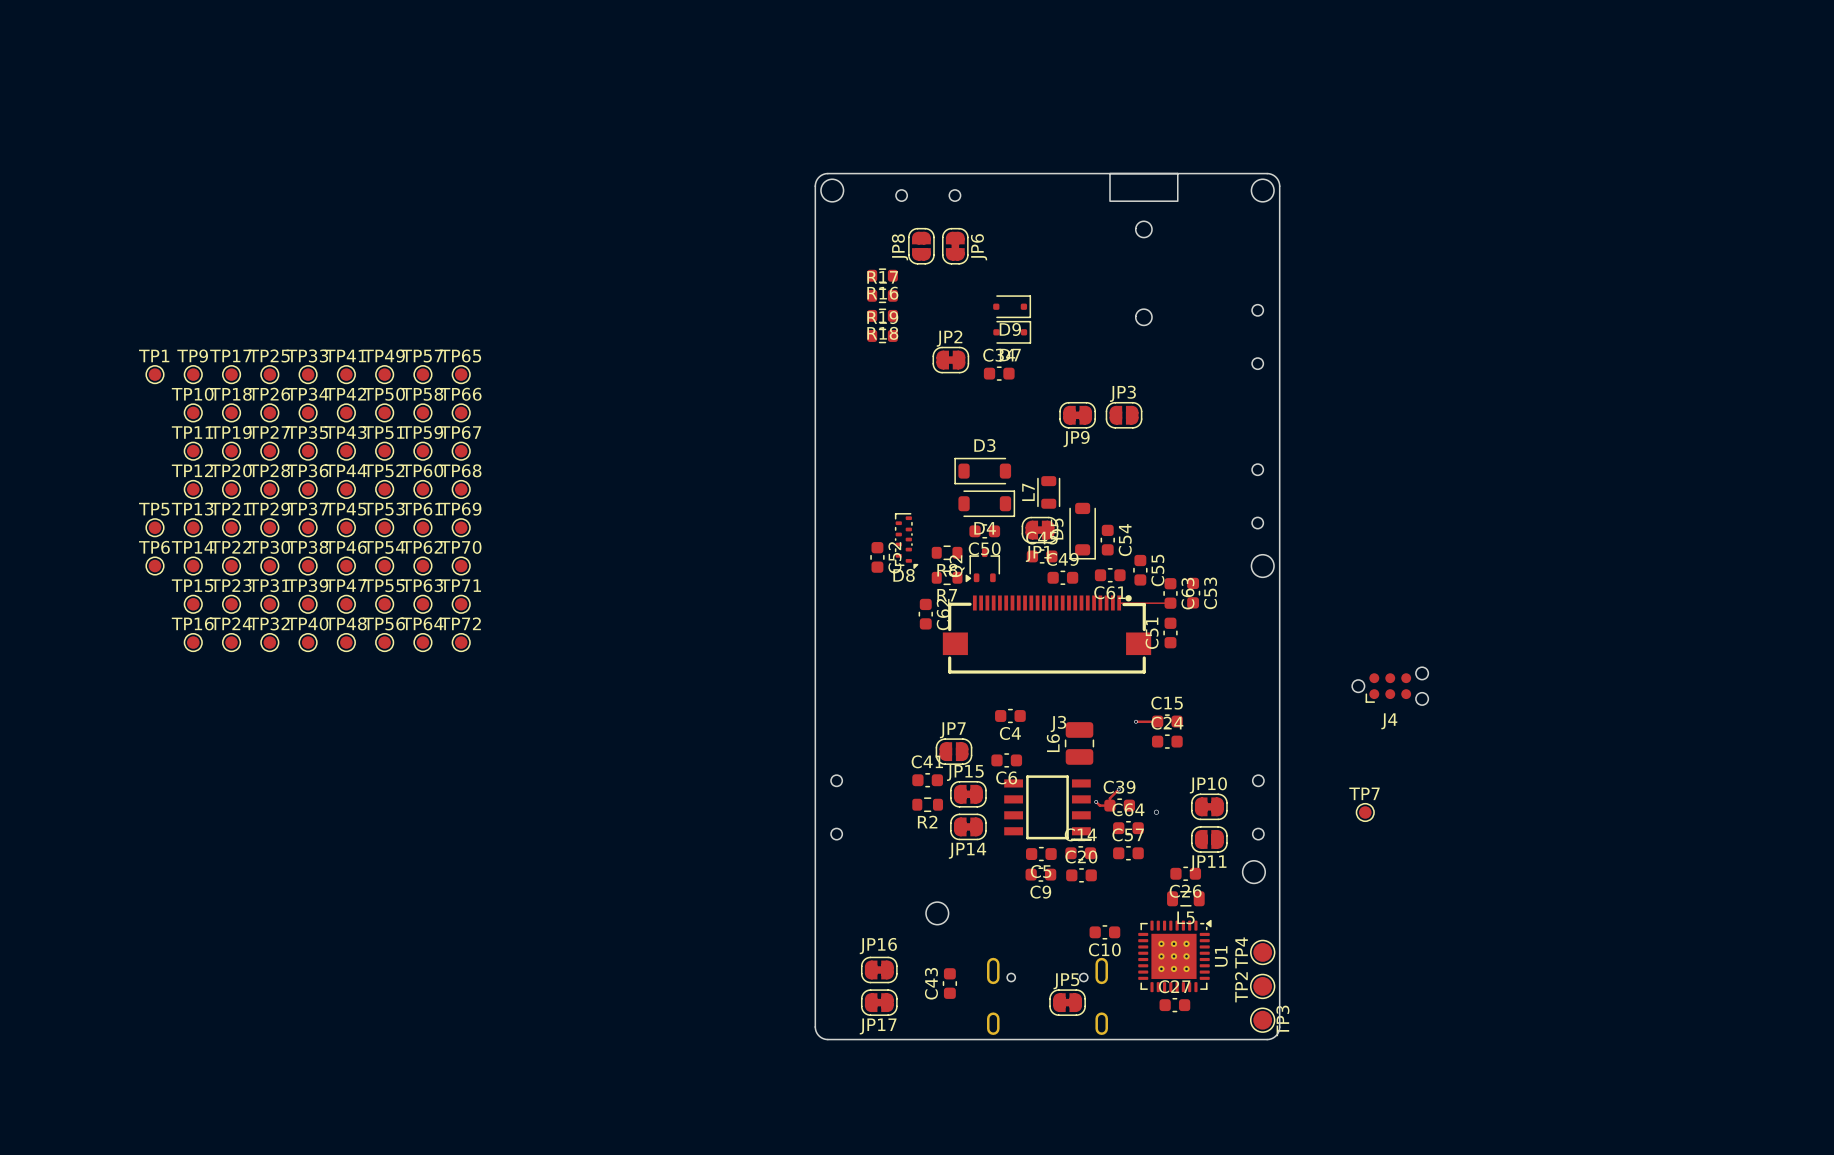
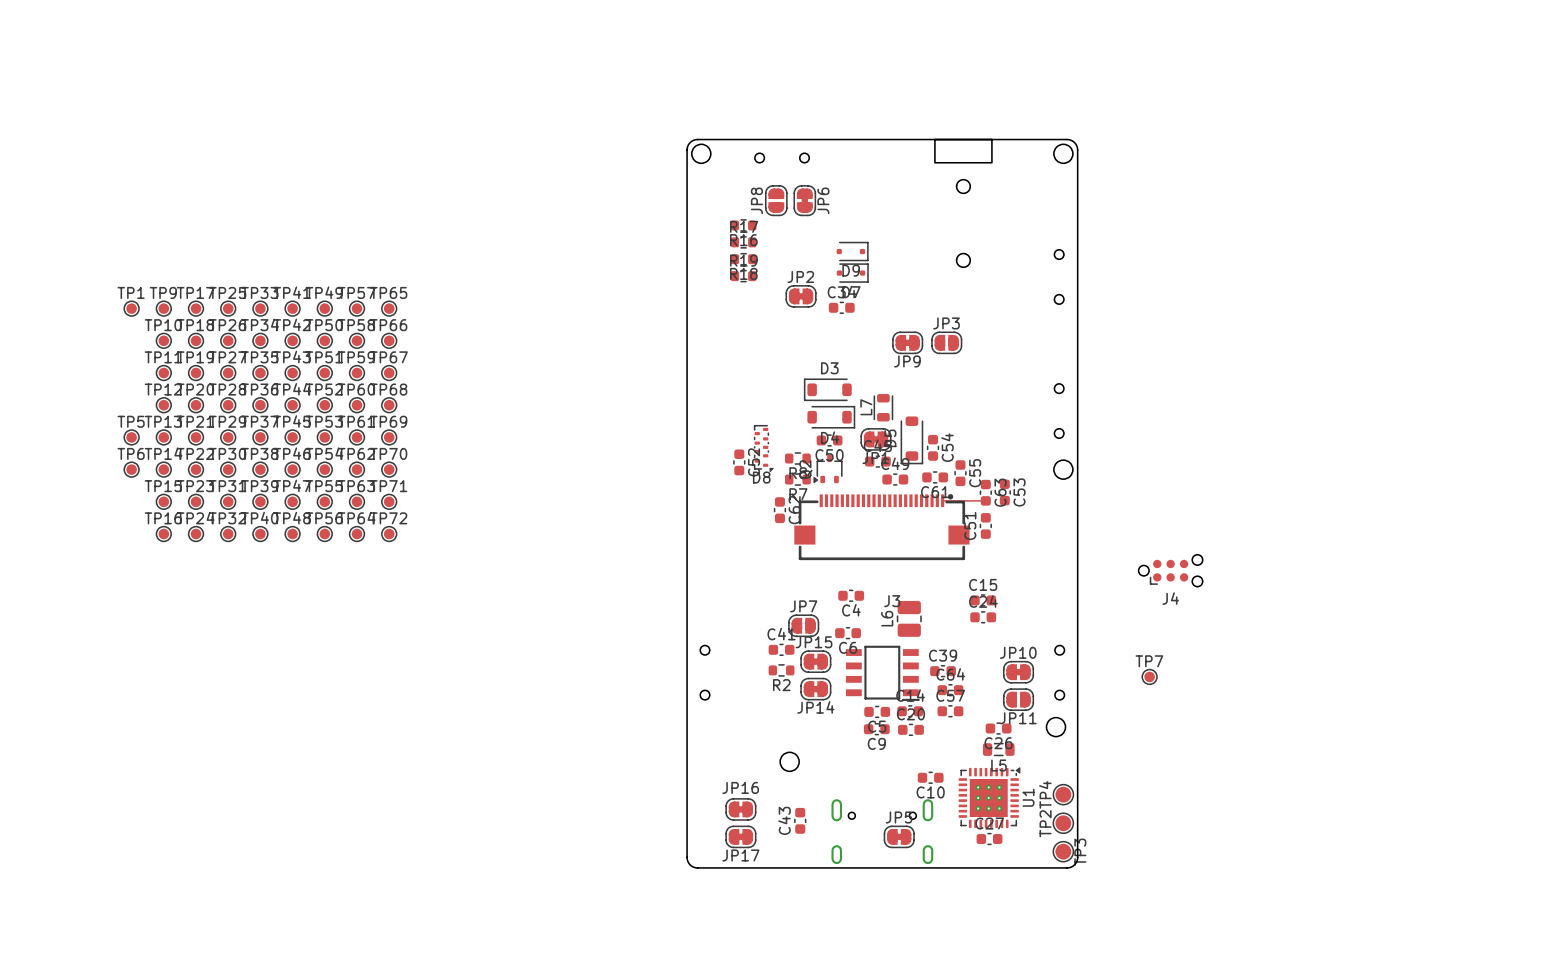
via: (1135, 721) -> none
track: (1136, 721) (1157, 721) -> none
track: (1118, 789) (1109, 798) (1109, 805) (1099, 805) (1096, 801) -> none
via: (1118, 789) -> none
via: (1096, 801) -> none
via: (1156, 812) -> none

